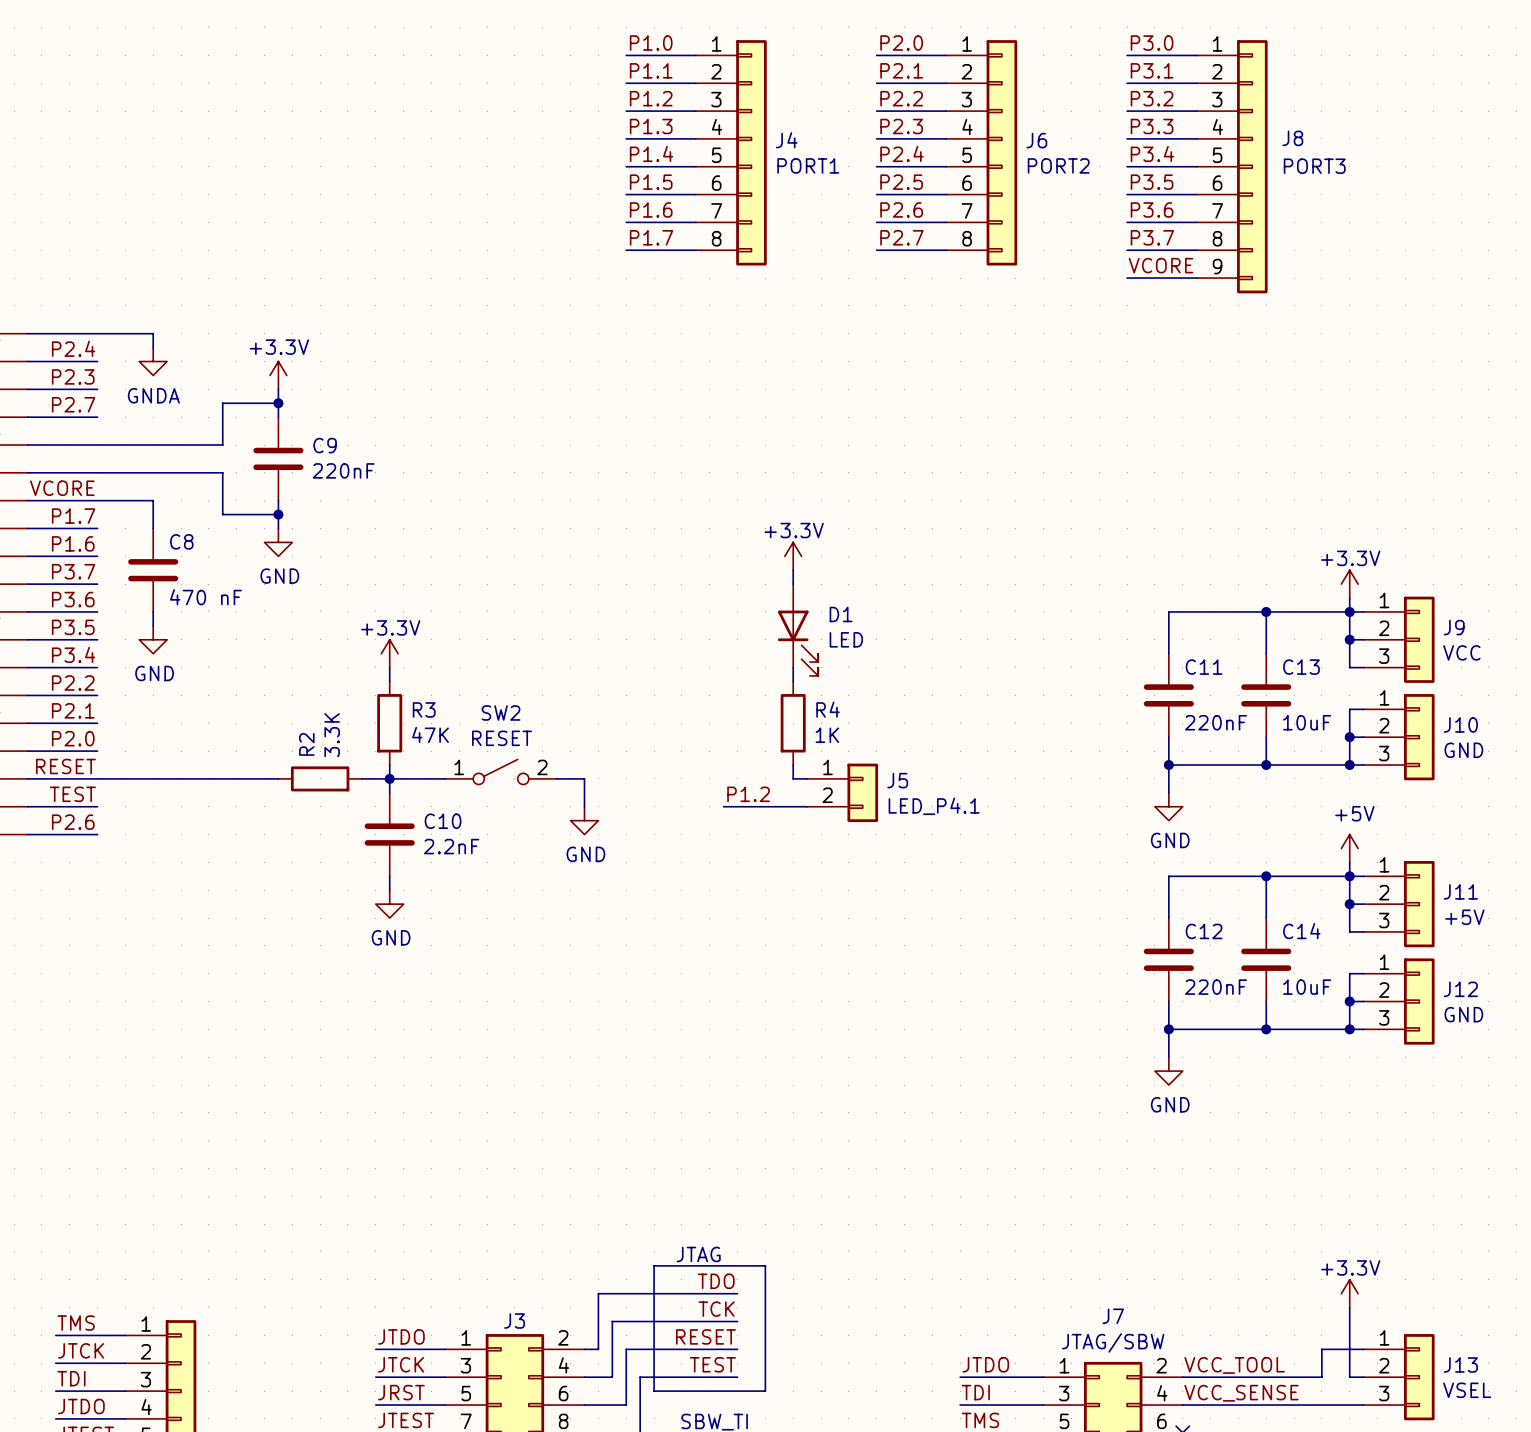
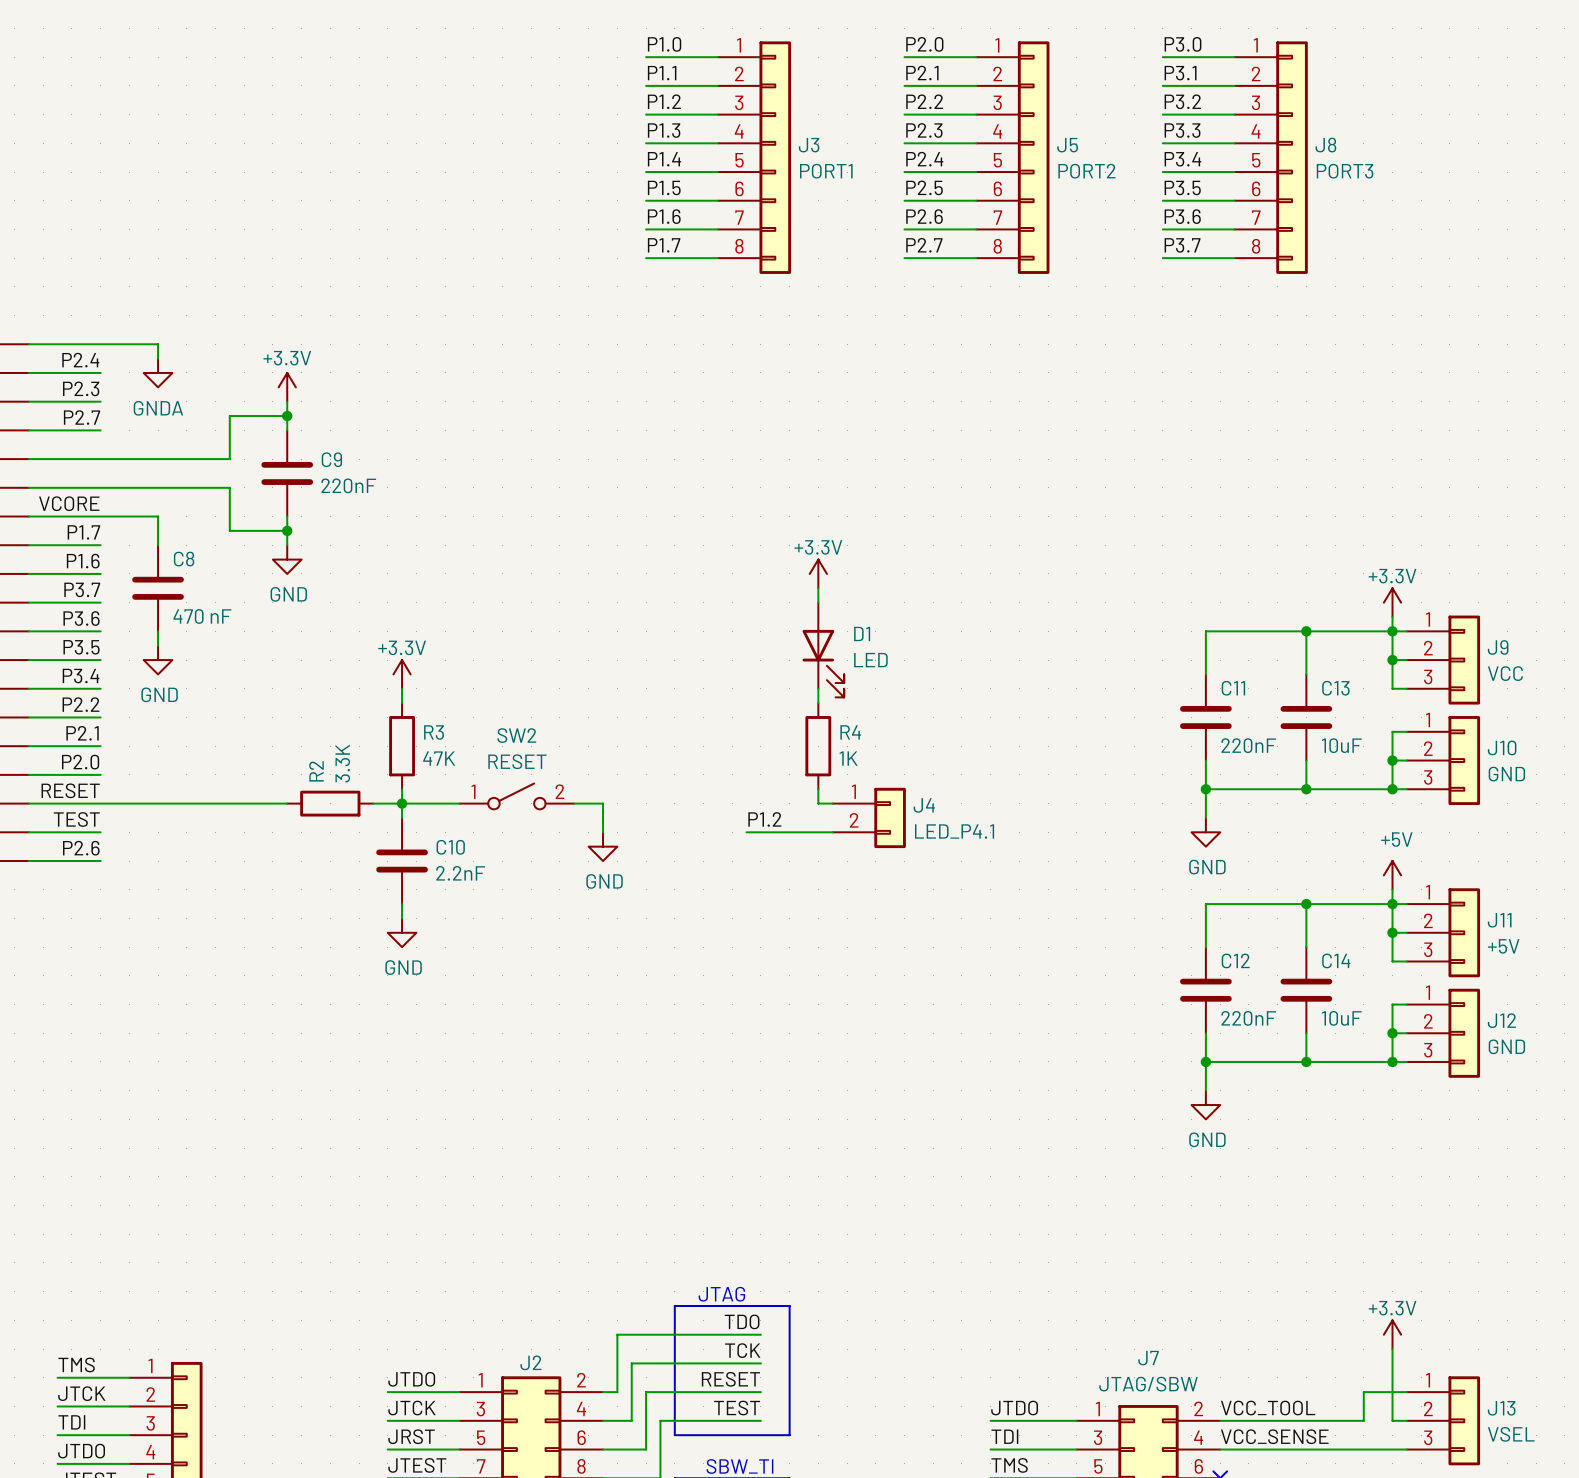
J8 symbol: [1196, 40, 1268, 294] -> [1234, 41, 1308, 274]
J4 name: J4 (786, 140) -> J3 (809, 145)
J6 name: J6 (1036, 140) -> J5 (1067, 145)
label: VCORE (1161, 265) -> none
wire: (1127, 278) (1196, 278) -> none
J5 name: J5 (897, 780) -> J4 (924, 805)
J3 name: J3 (514, 1321) -> J2 (530, 1362)

